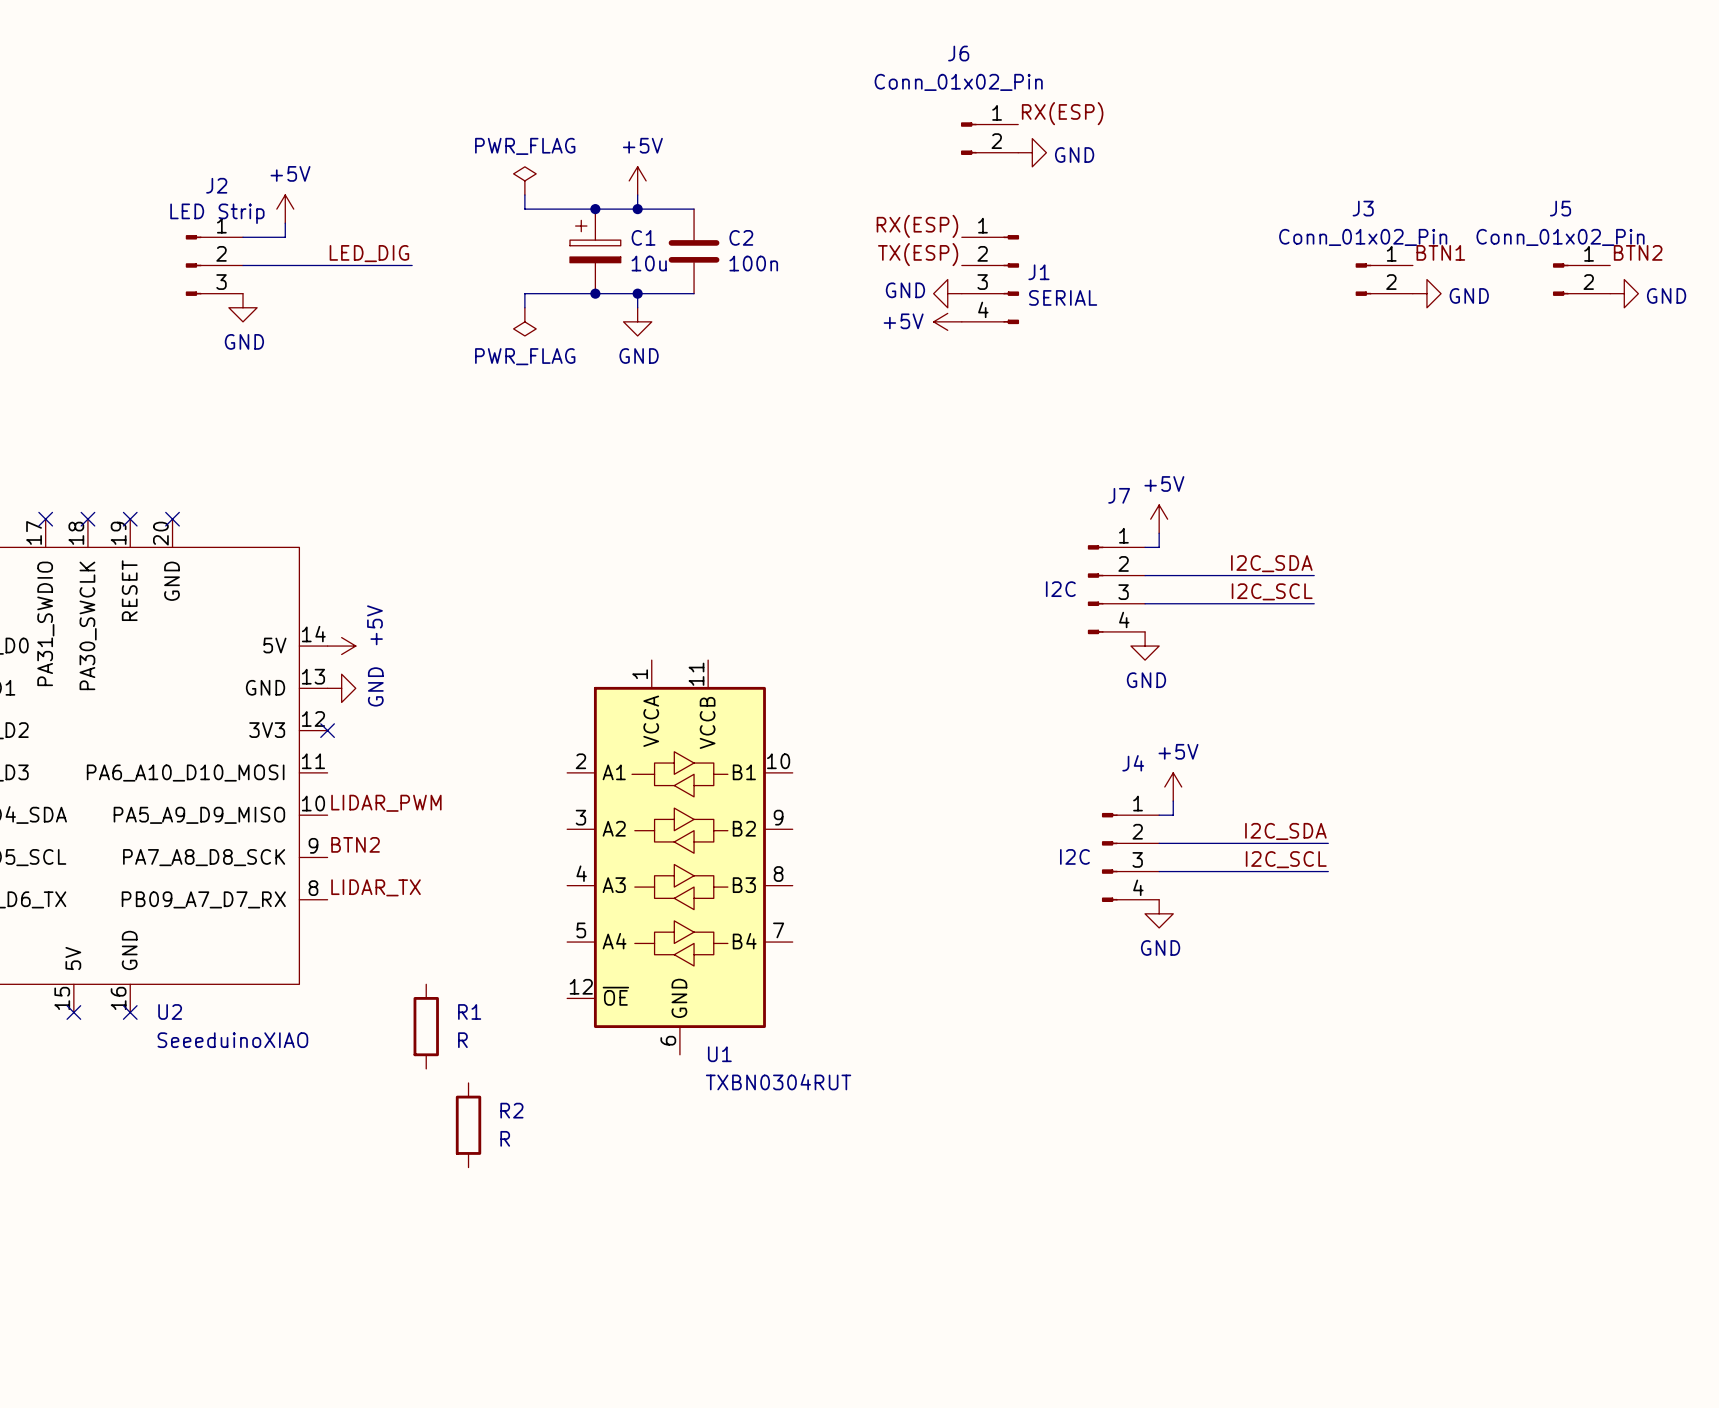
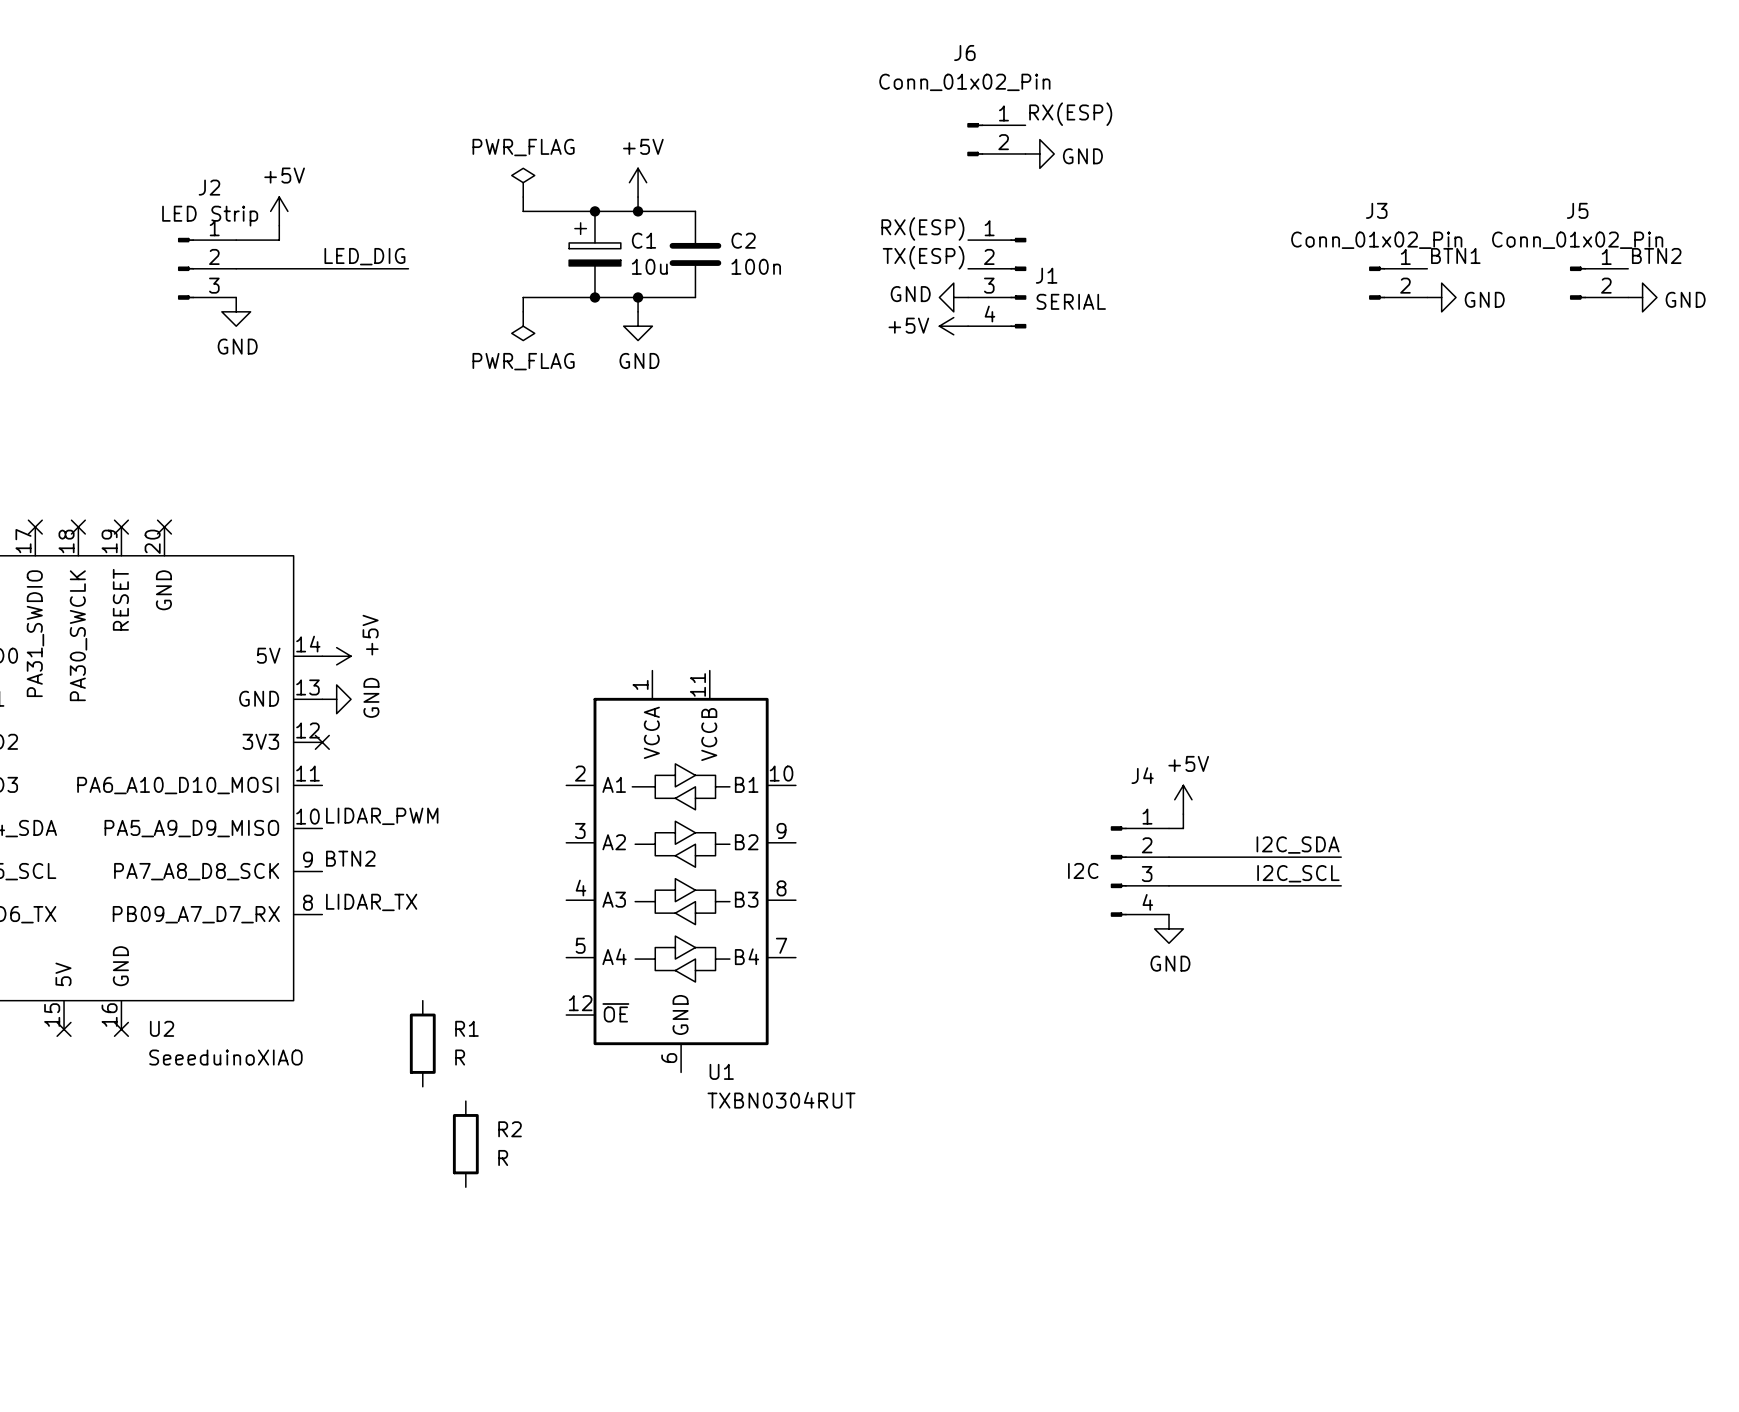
power symbol: +5V (1159, 519) -> none
wire: (1159, 533) (1159, 547) (1145, 547) -> none
label: I2C_SDA (1271, 563) -> none
wire: (1145, 575) (1314, 575) -> none
J7: I2C (1116, 589) -> none
label: I2C_SCL (1272, 591) -> none
wire: (1145, 603) (1314, 603) -> none
power symbol: GND (1145, 646) -> none

